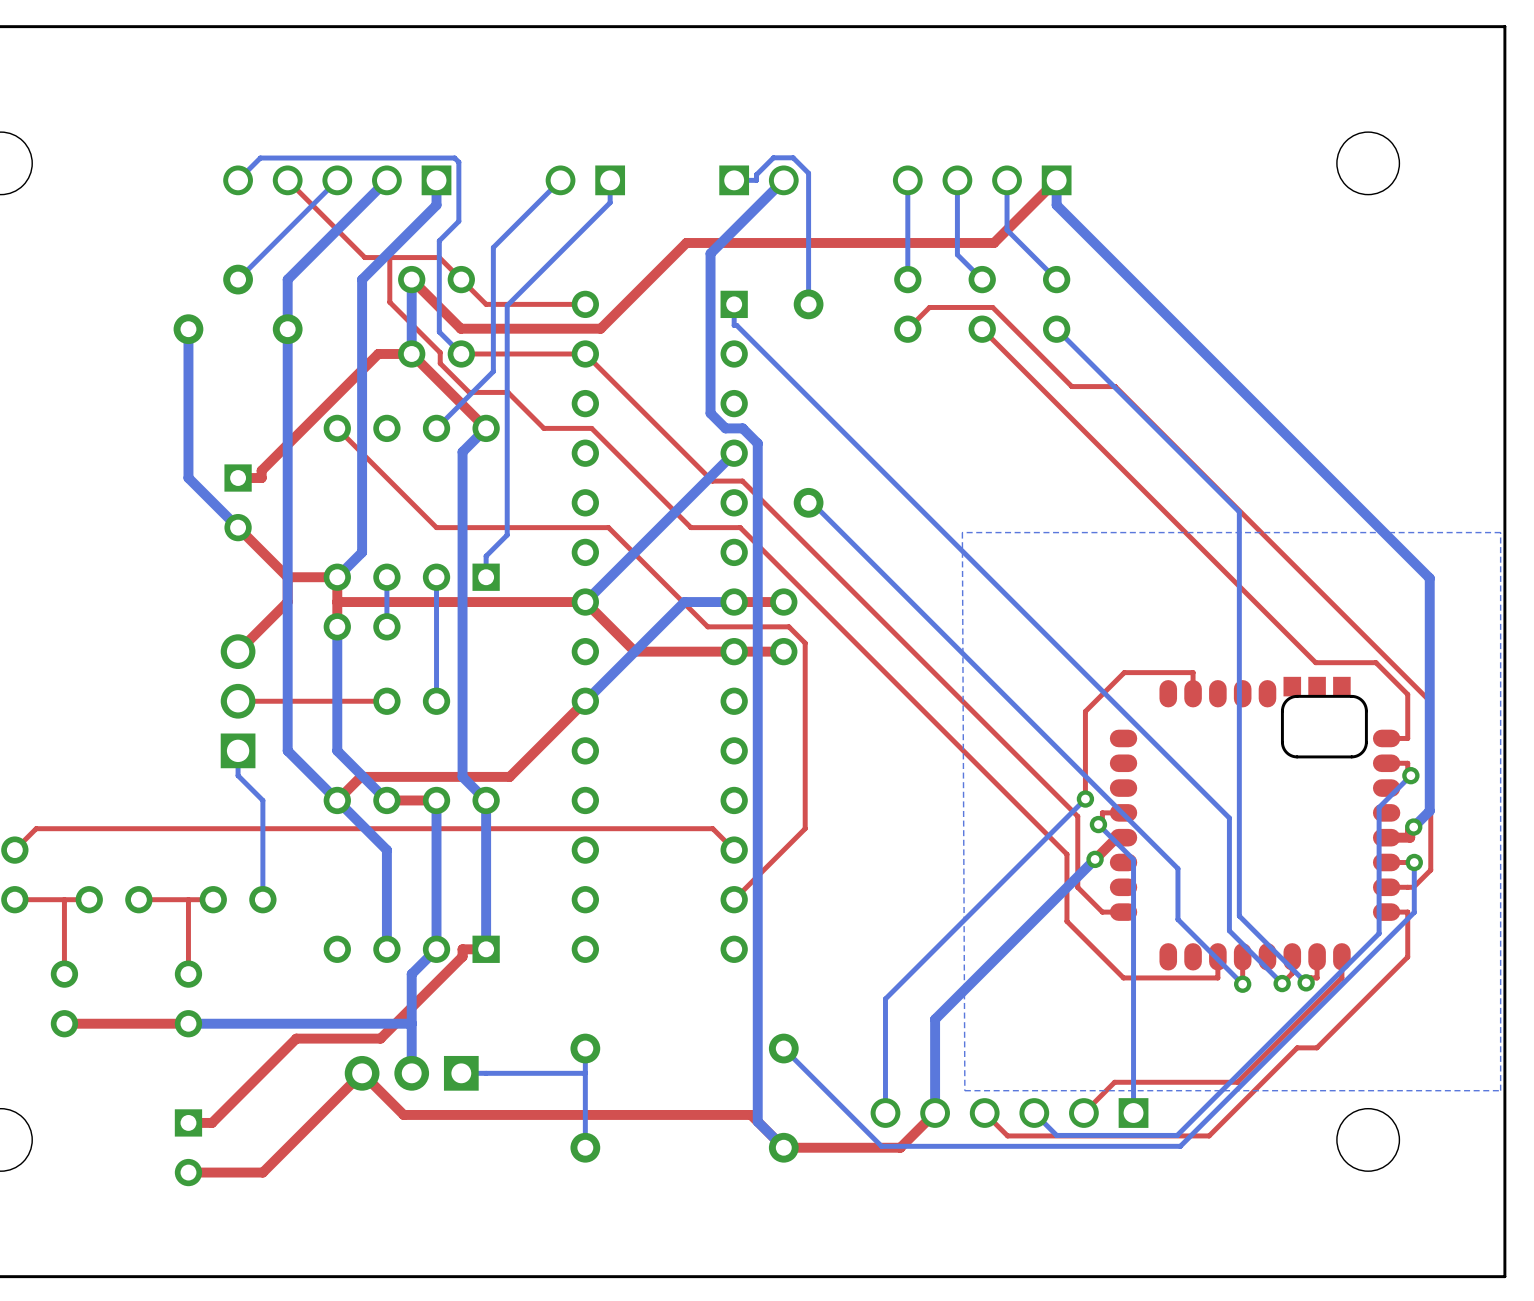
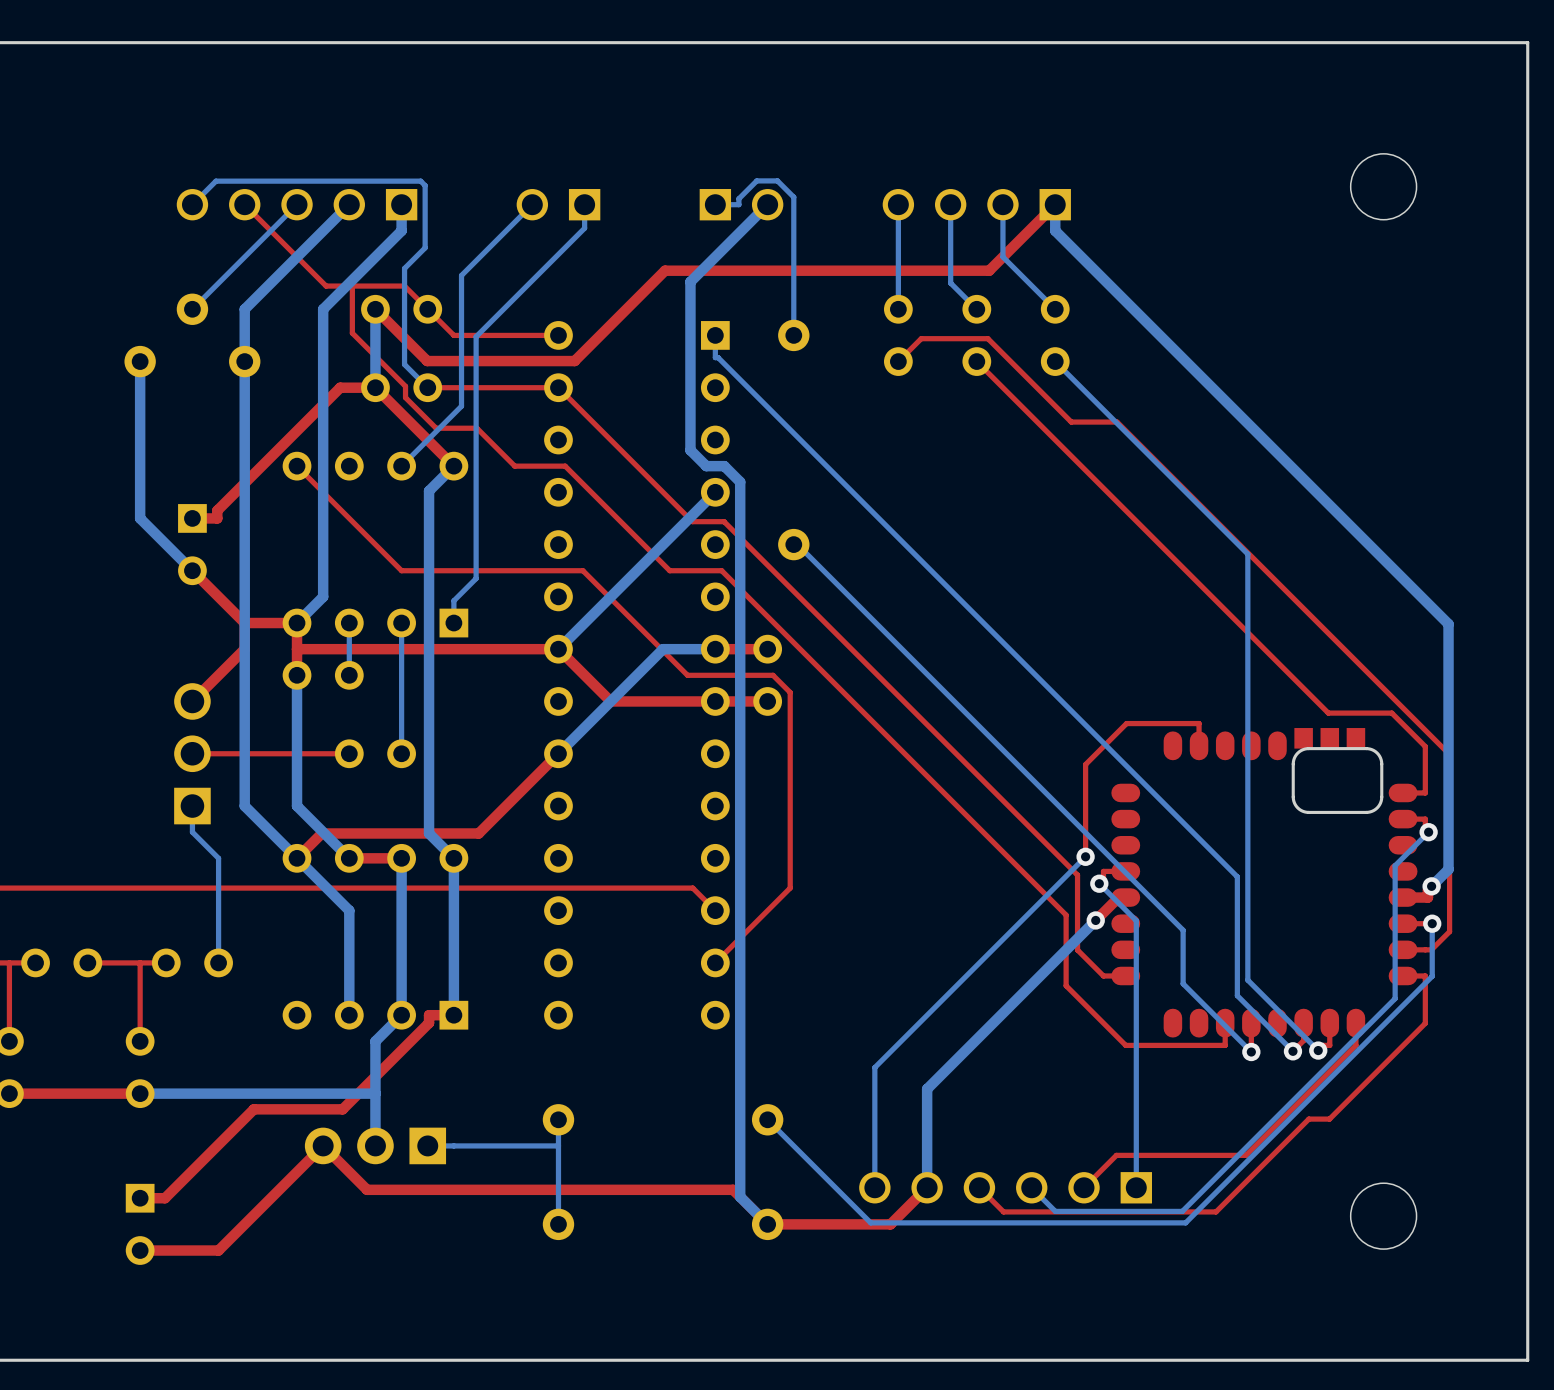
bottom zone outline: (1500, 532) (1500, 1090) (964, 1090) (962, 532) (1500, 532) -> none

